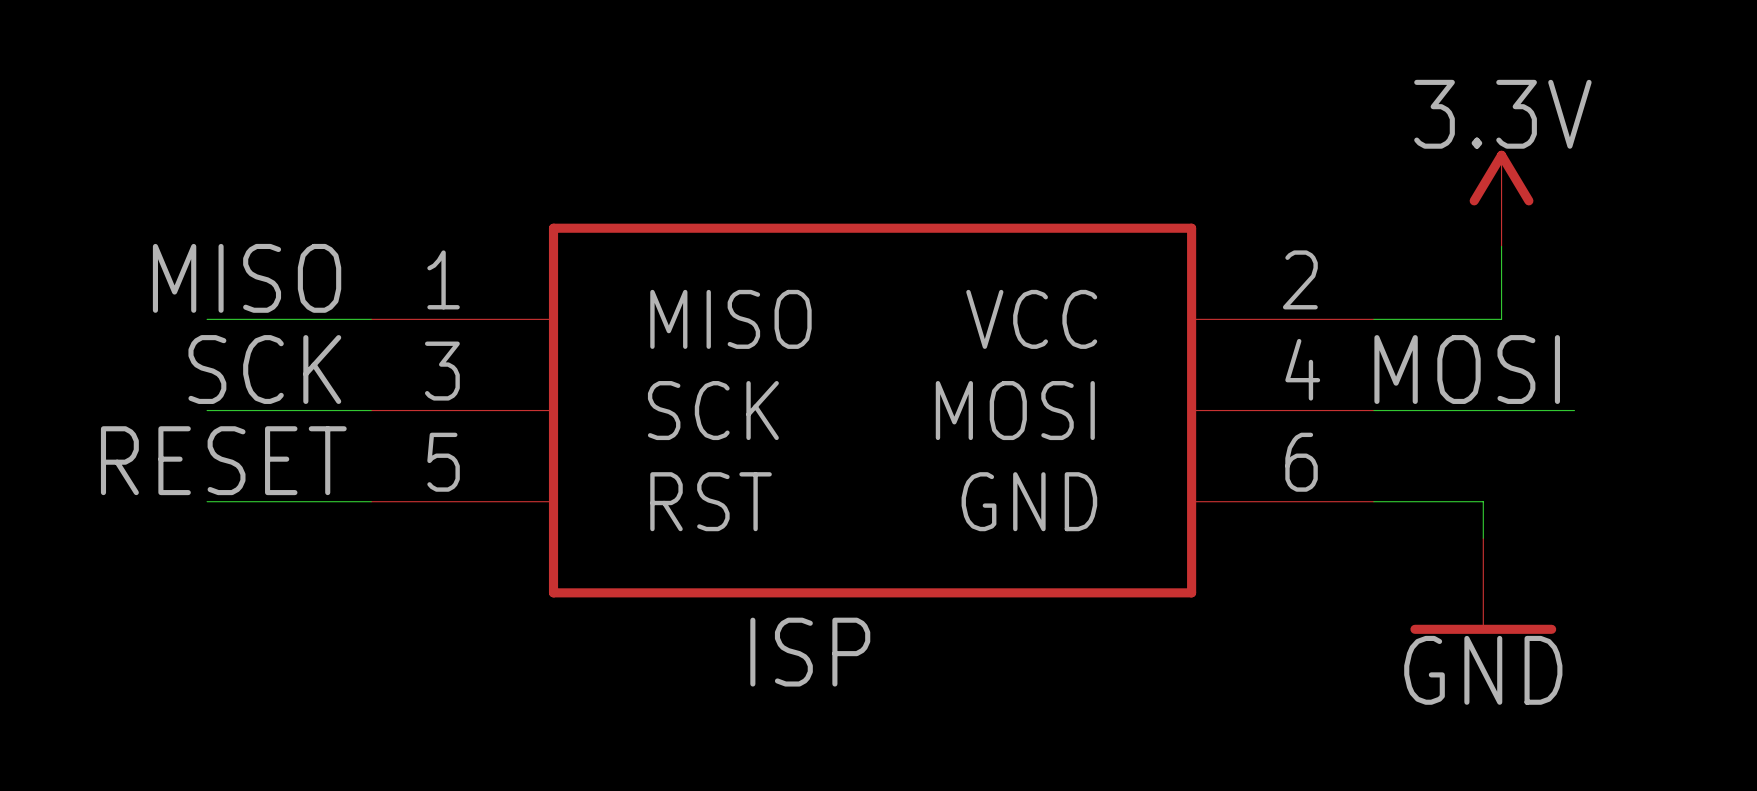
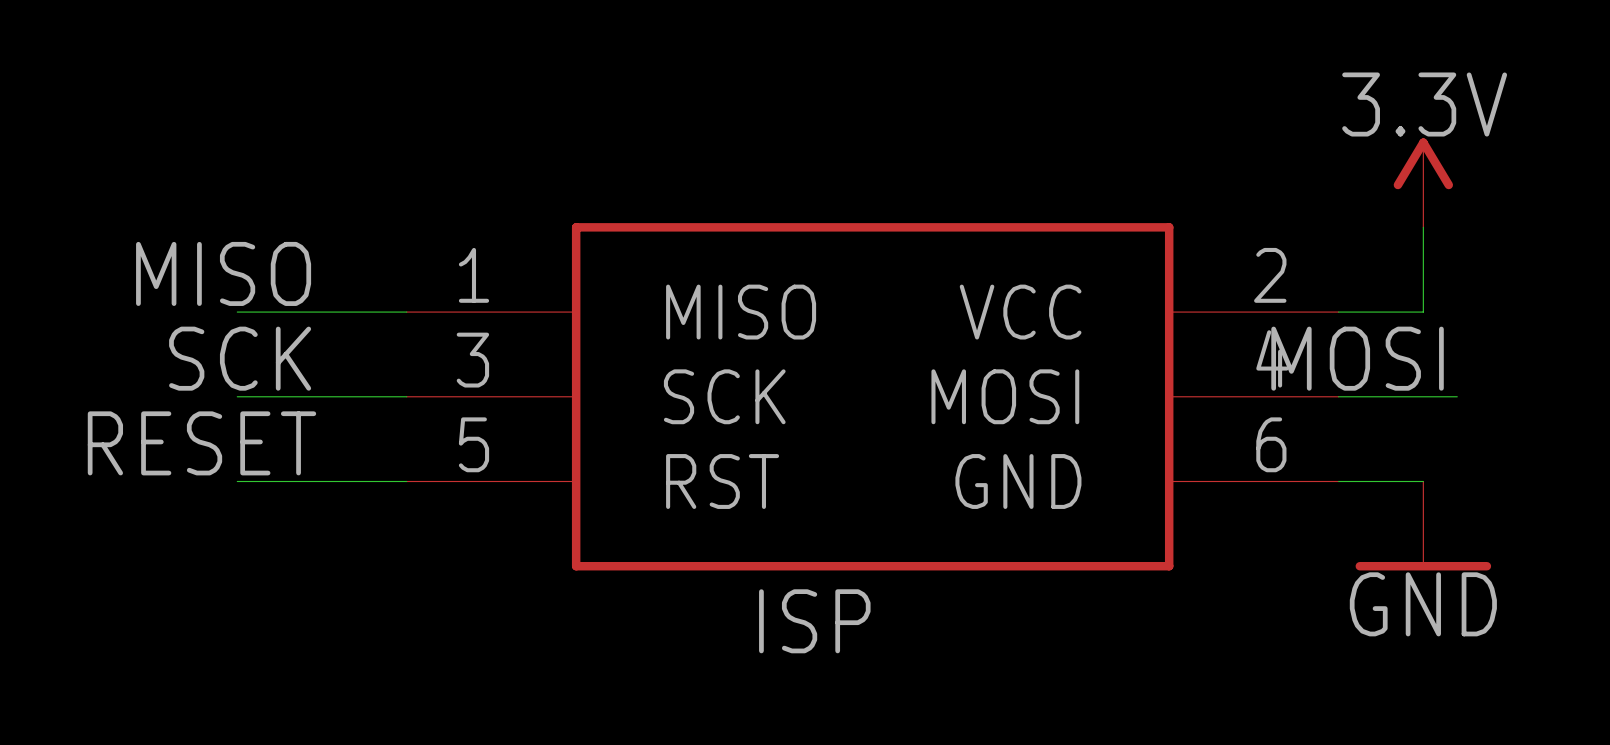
power symbol position: 3.3V (1501, 198) -> 3.3V (1423, 182)
wire: (1501, 246) (1501, 319) -> (1423, 227) (1423, 312) (1389, 312)
wire: (207, 319) (261, 319) -> none
wire: (207, 410) (261, 410) -> none
ISP position: (872, 410) -> (872, 396)
wire: (207, 501) (261, 501) -> none
wire: (1483, 501) (1483, 538) -> (1372, 481) (1423, 481)
power symbol position: GND (1483, 586) -> GND (1423, 525)

